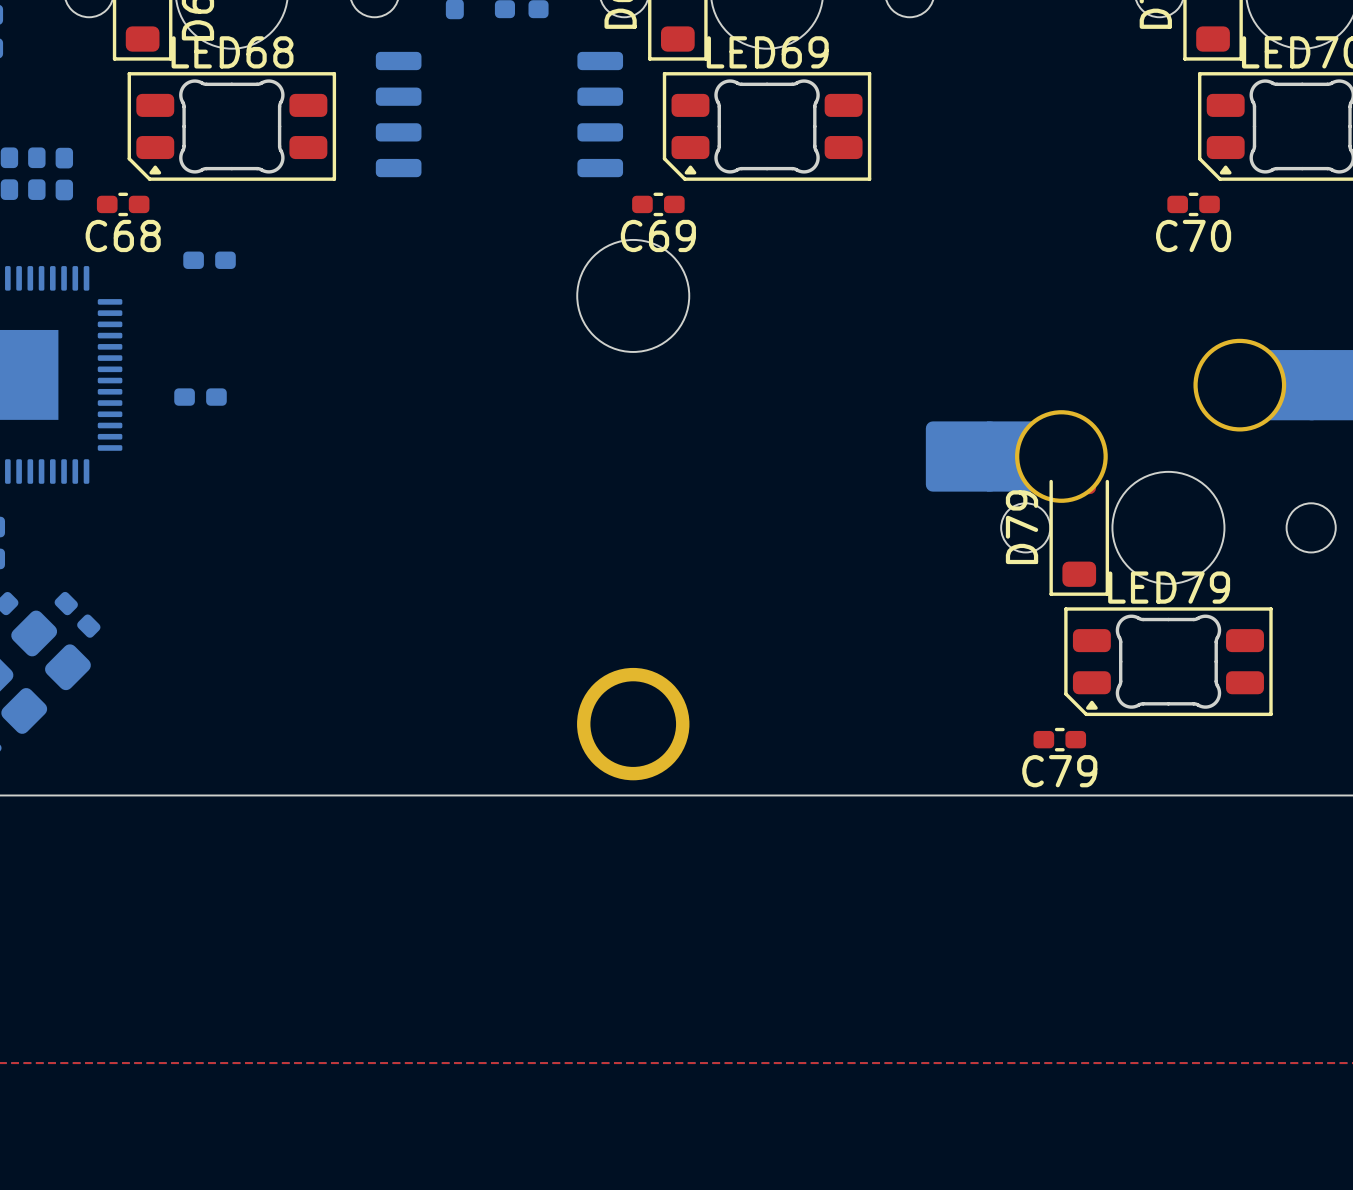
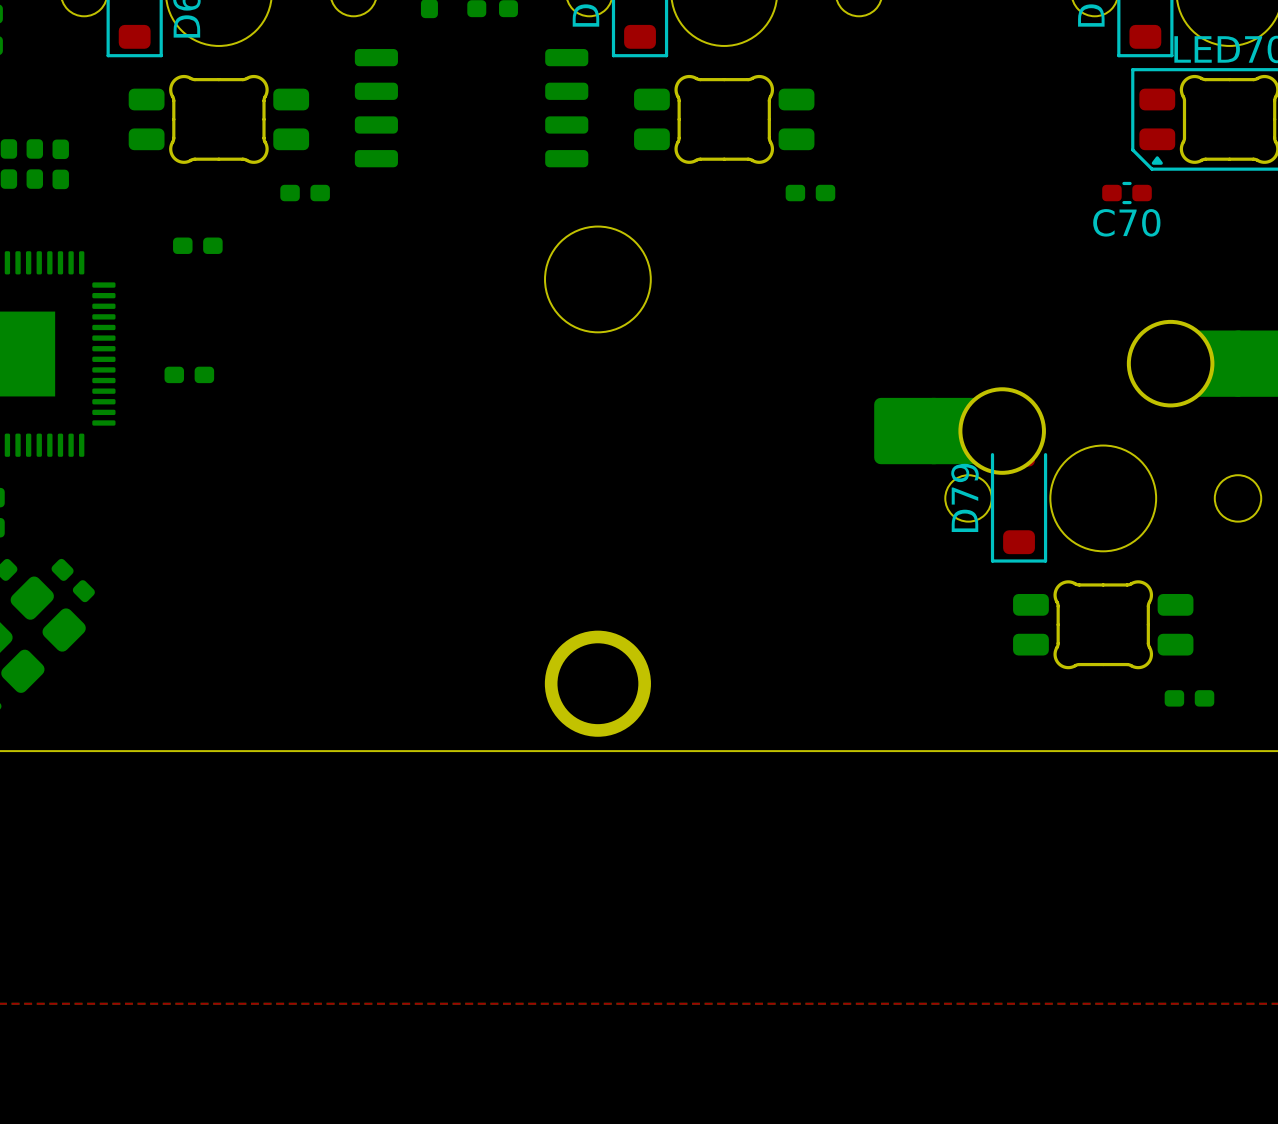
LED68 side: top (231, 126) -> bottom (218, 119)
LED69 side: top (767, 126) -> bottom (724, 119)
C68 side: top (123, 204) -> bottom (305, 193)
C69 side: top (658, 204) -> bottom (810, 193)
LED79 side: top (1168, 661) -> bottom (1103, 624)
C79 side: top (1059, 739) -> bottom (1189, 698)

